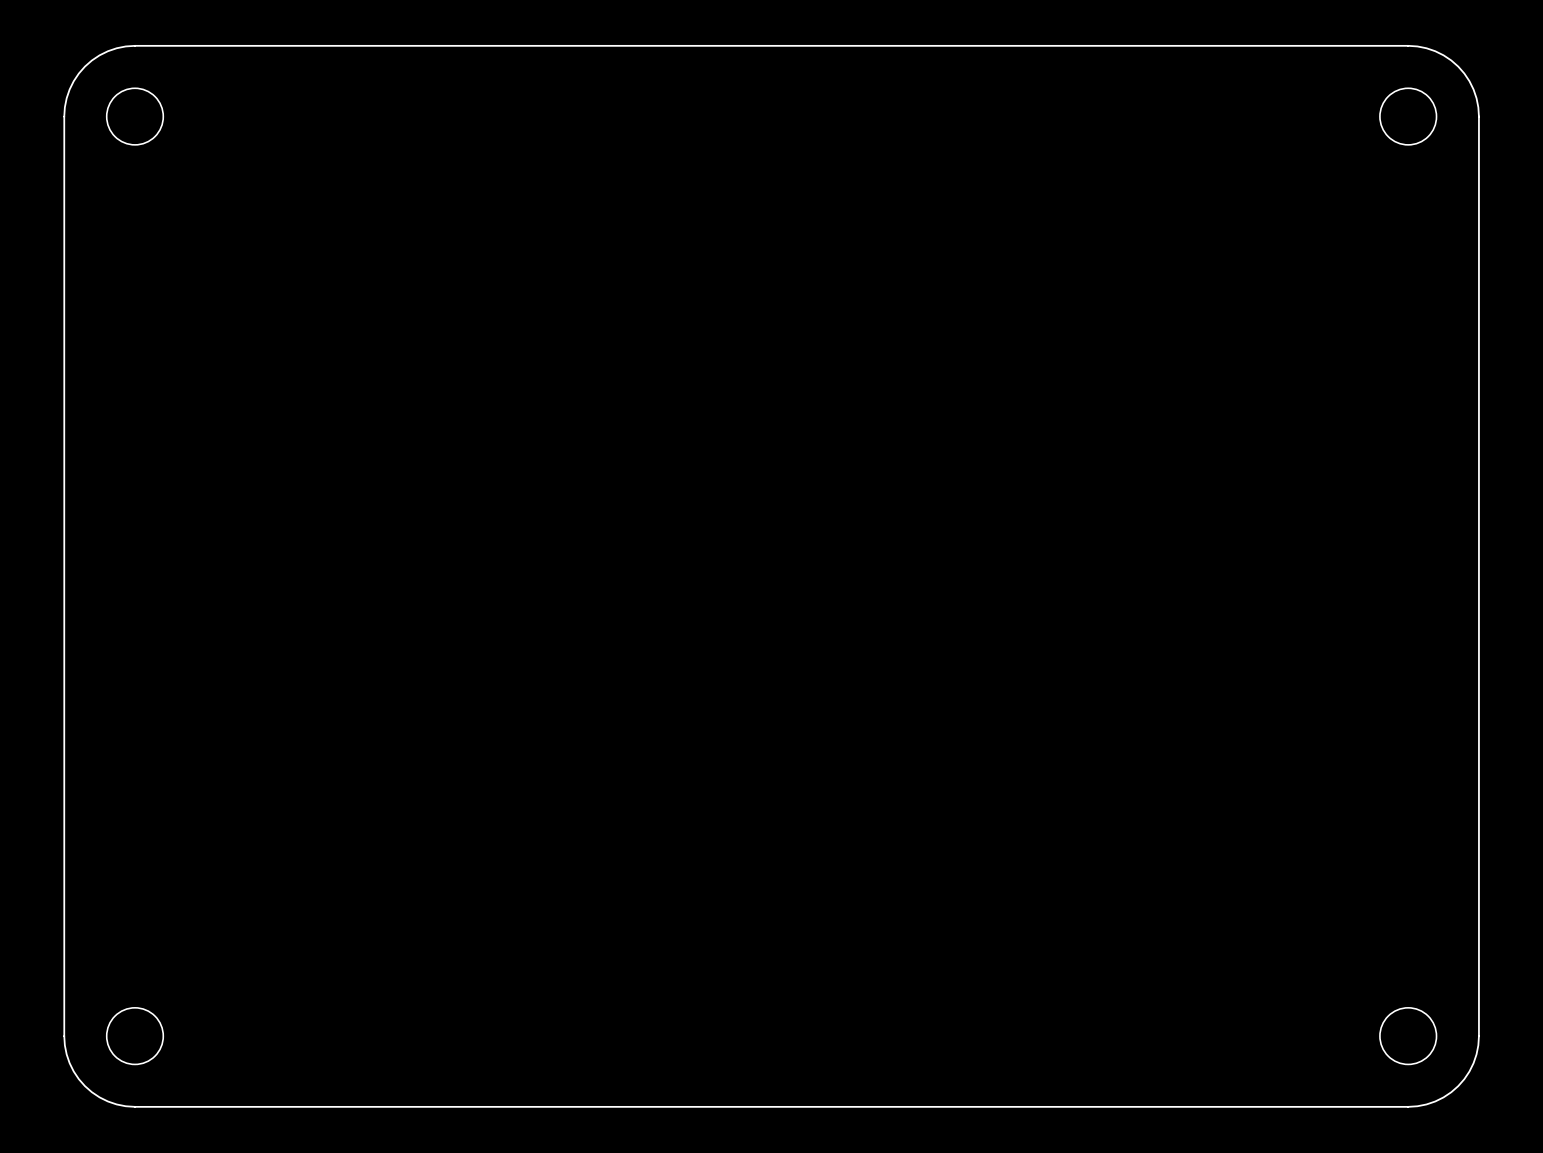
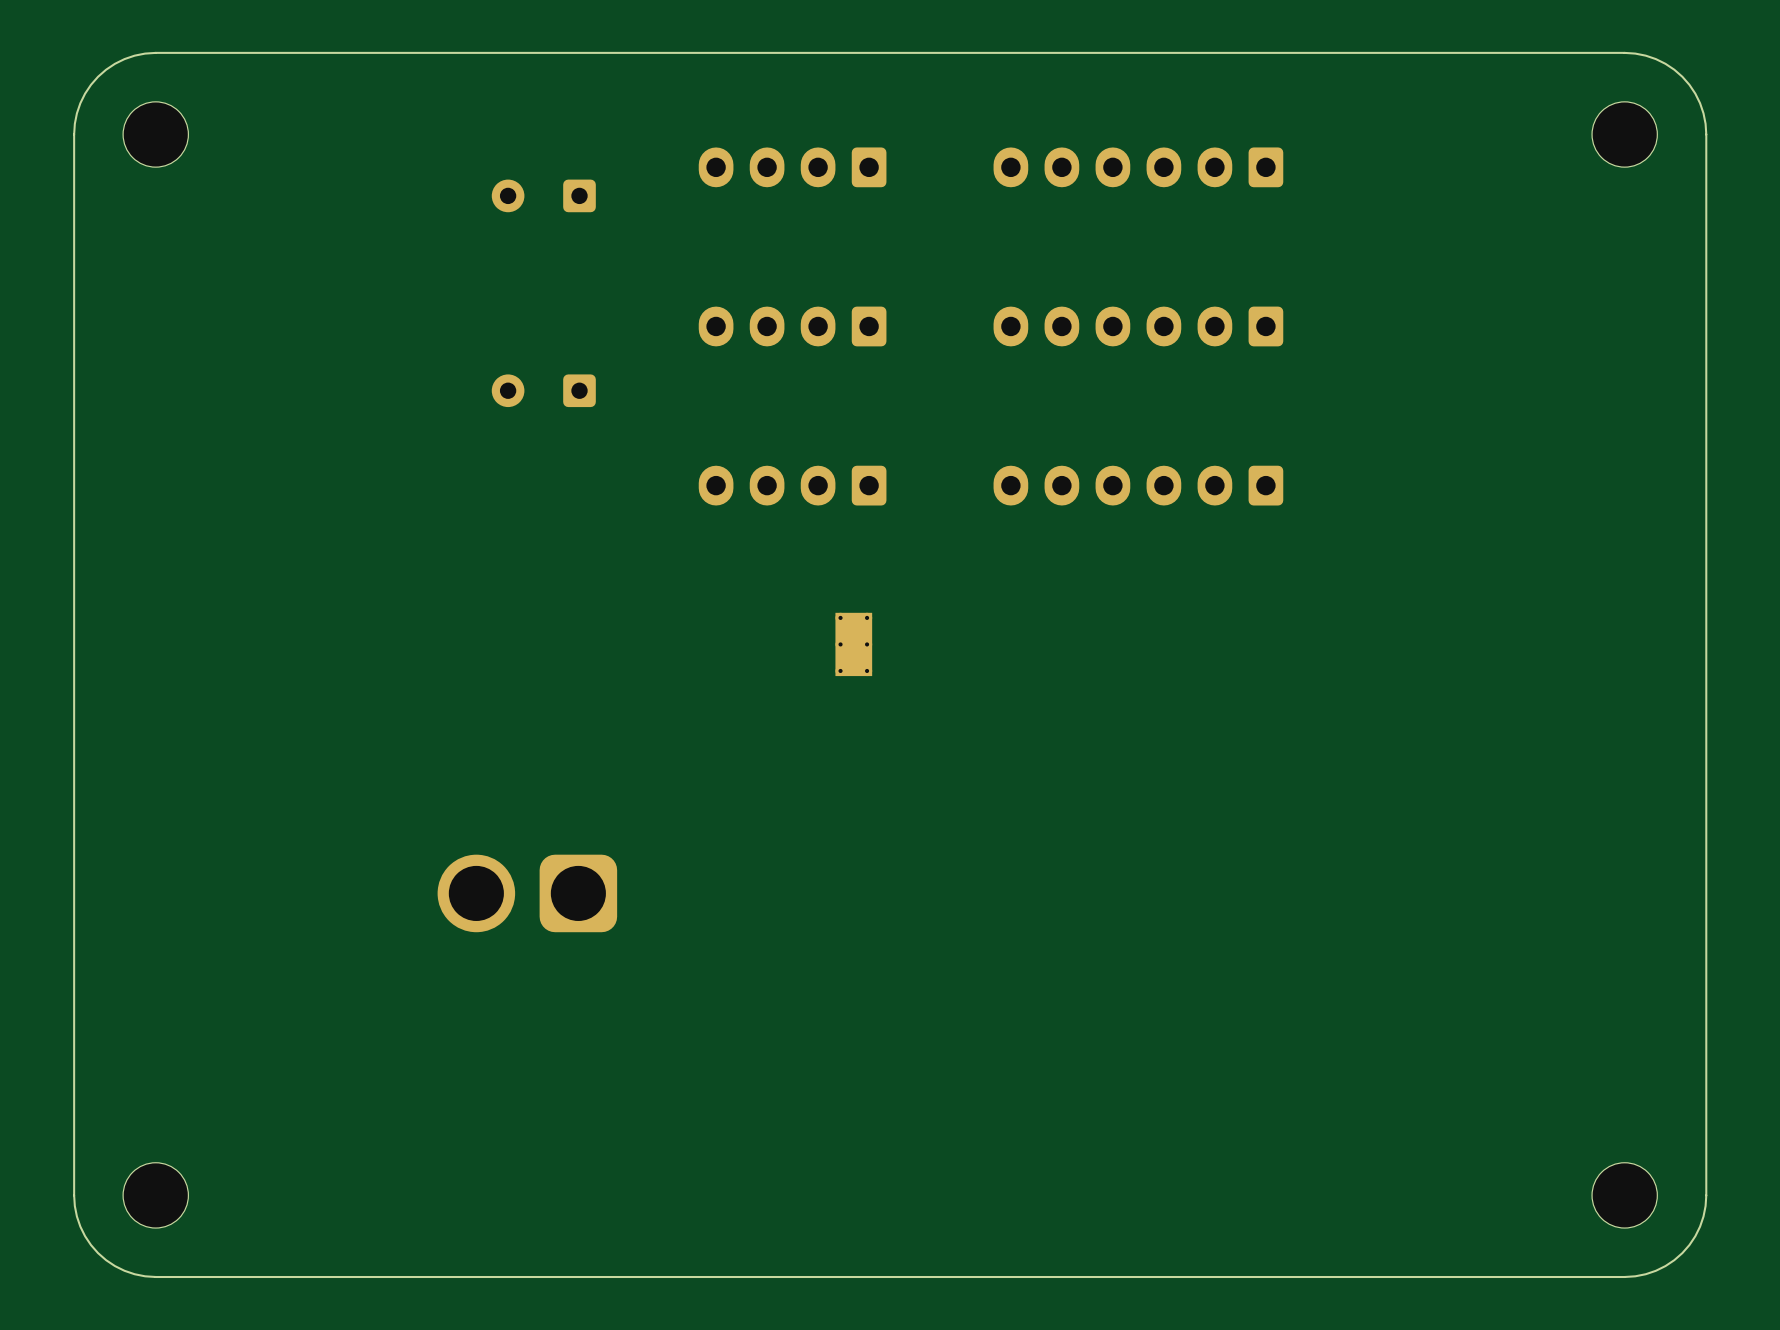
part: none -> (792, 167)
part: none -> (1138, 167)
part: none -> (543, 195)
part: none -> (792, 326)
part: none -> (1138, 326)
part: none -> (543, 390)
part: none -> (792, 485)
part: none -> (1138, 485)
part: none -> (853, 644)
part: none -> (527, 893)

